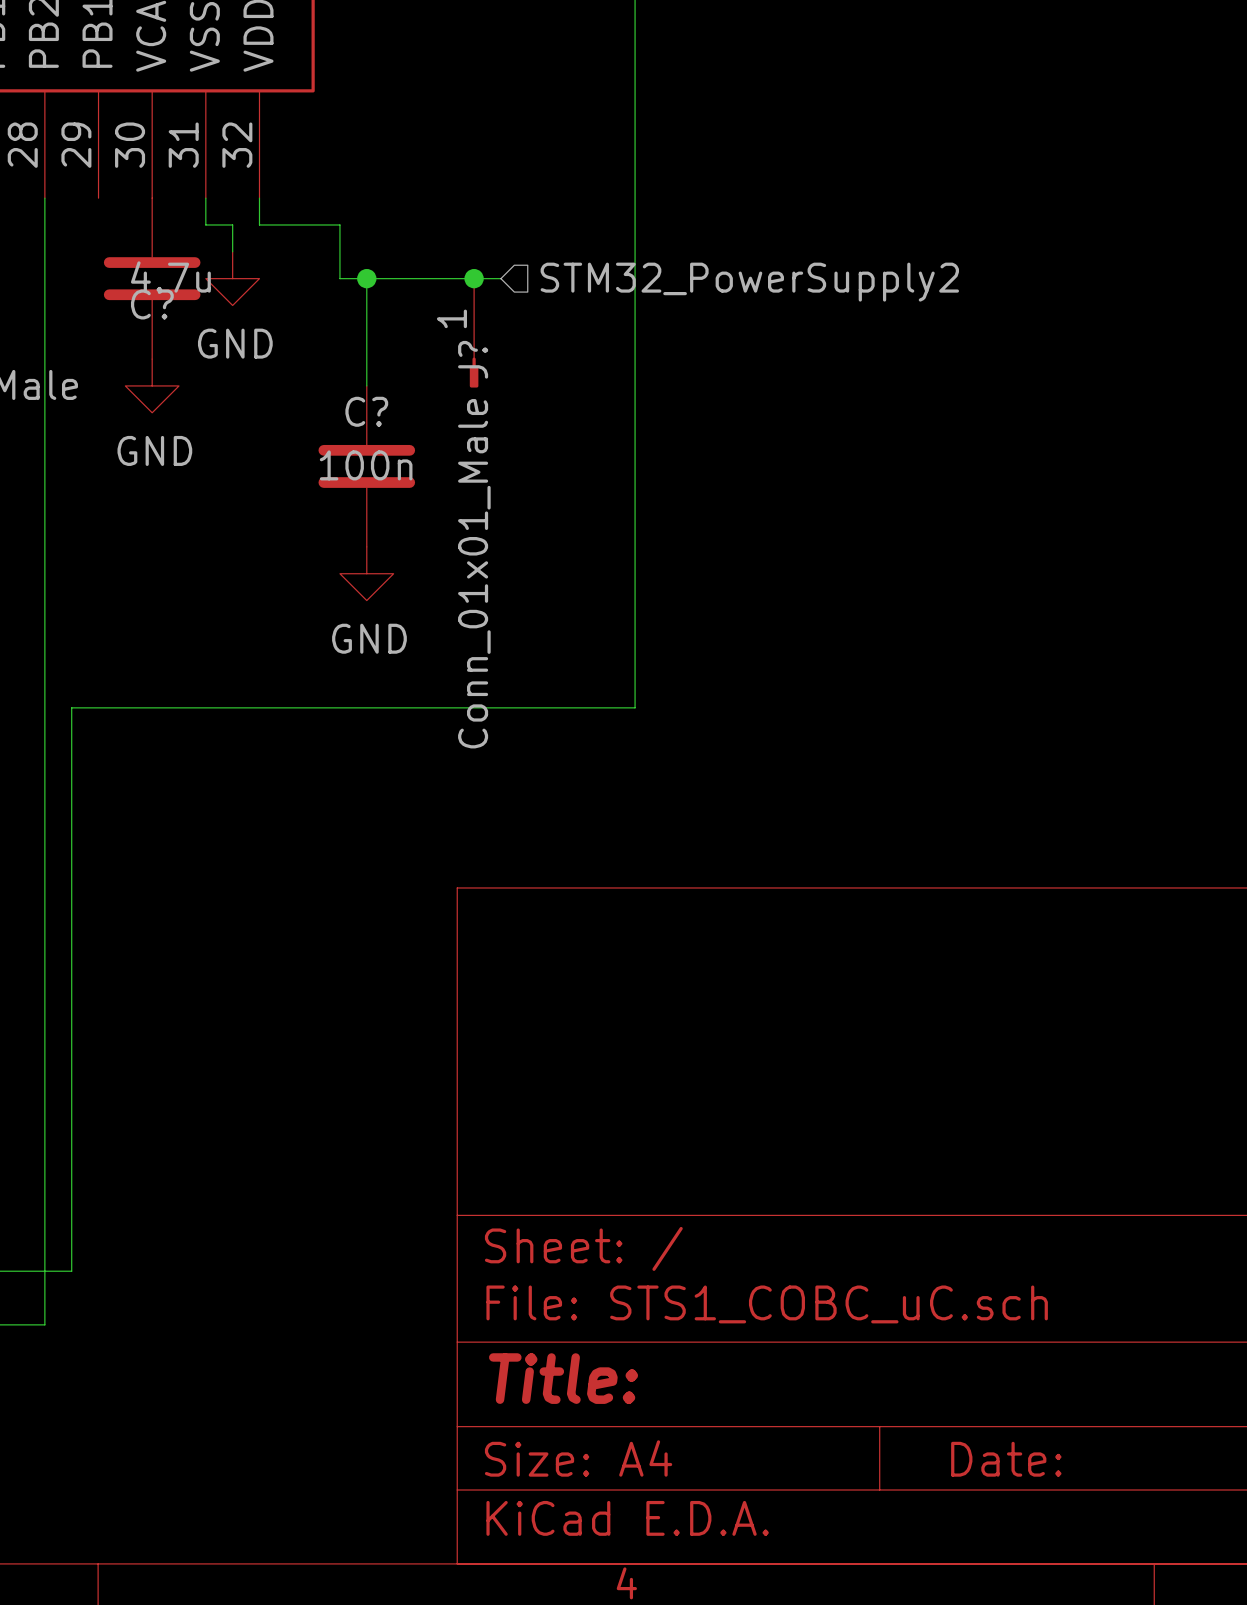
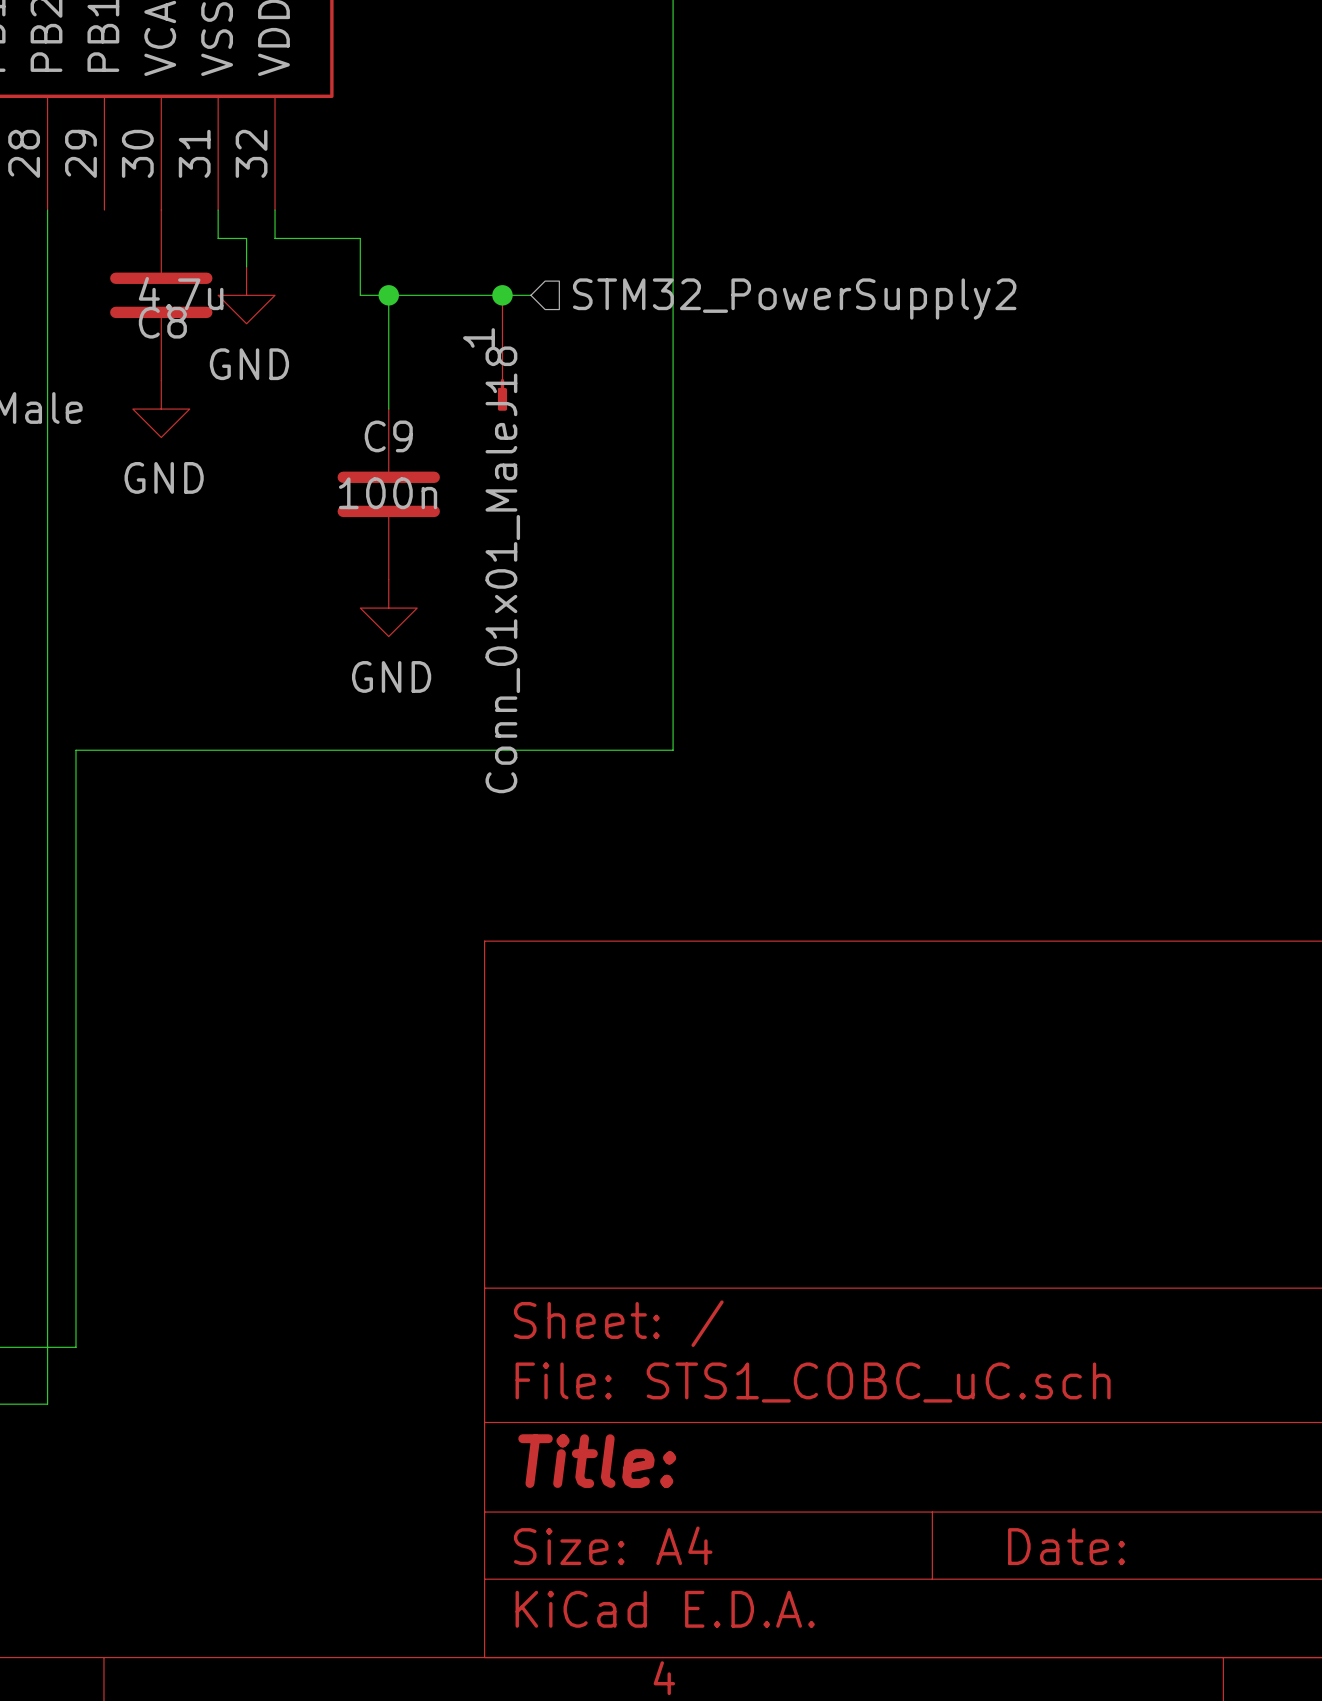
C? name: C? (152, 304) -> C8 (162, 322)
J? name: J? (473, 359) -> J18 (501, 381)
C? name: C? (366, 411) -> C9 (388, 436)

